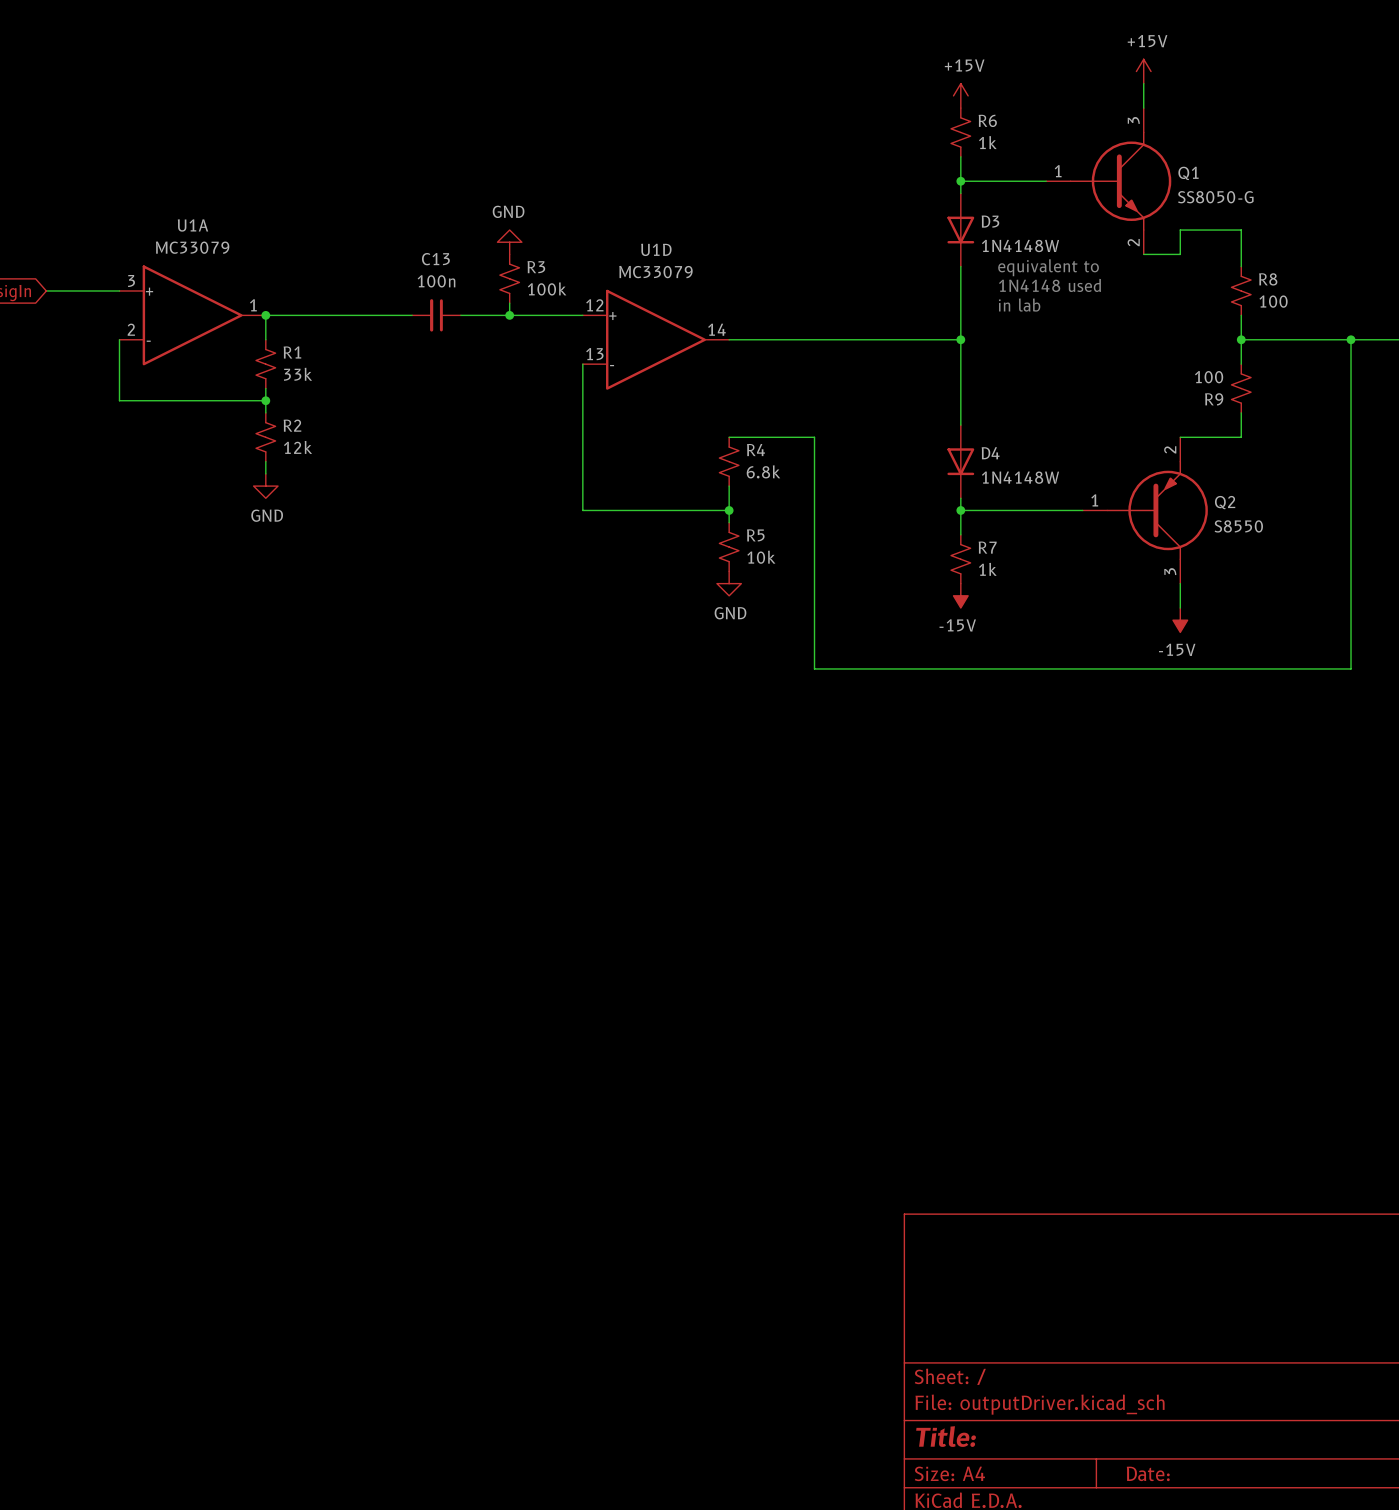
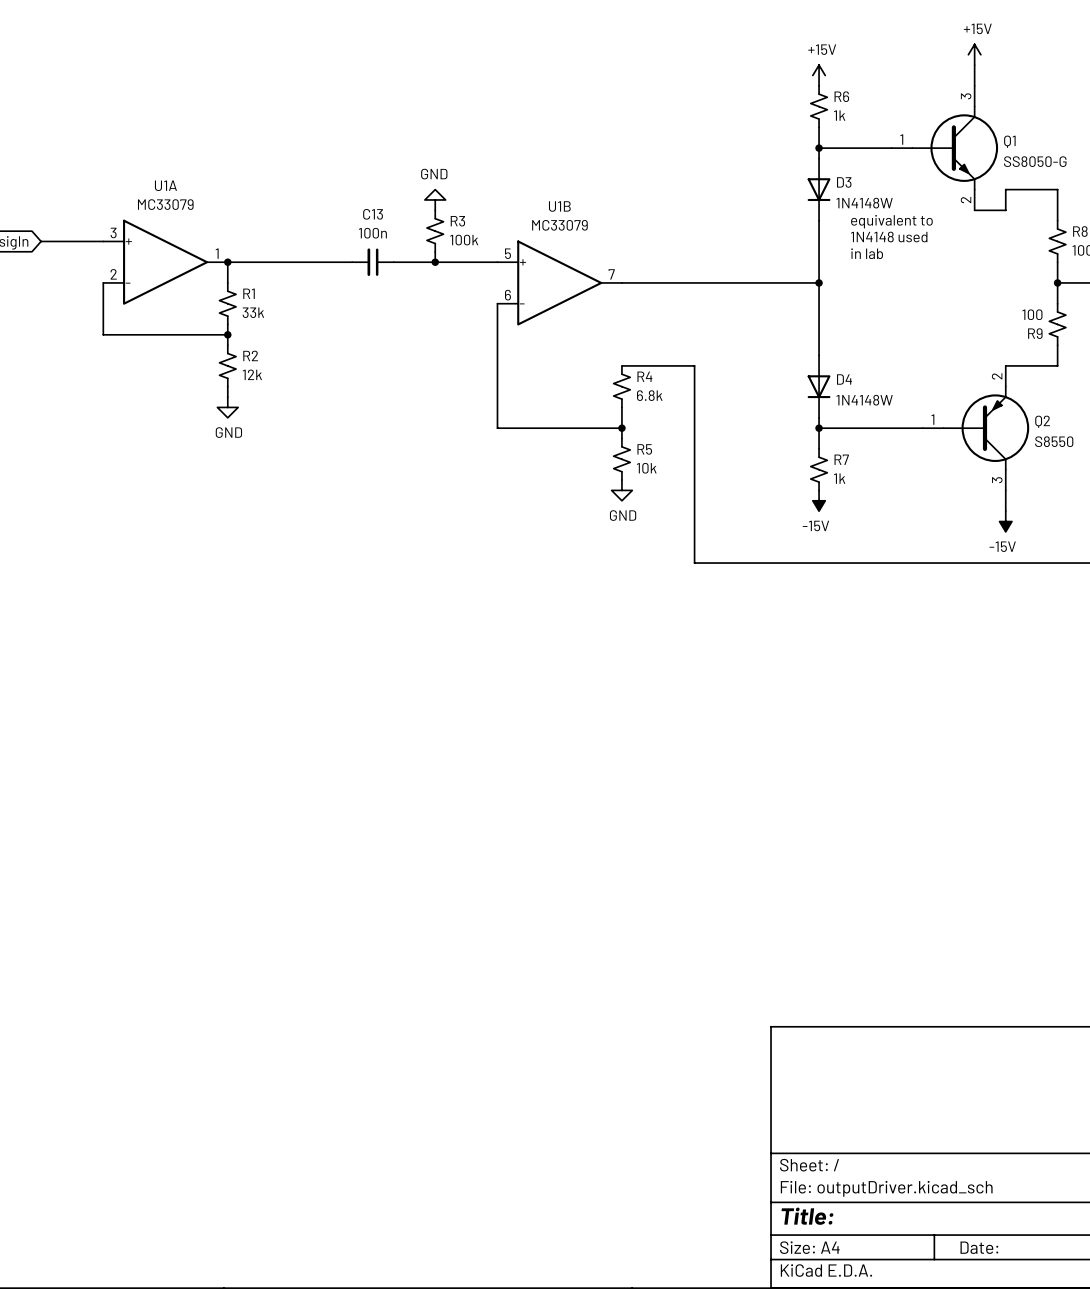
U1D name: U1D (656, 249) -> U1B (559, 206)
U1D pin number: 12 (594, 305) -> 5 (507, 253)
U1D pin number: 14 (716, 329) -> 7 (611, 274)
U1D pin number: 13 (594, 354) -> 6 (507, 295)

